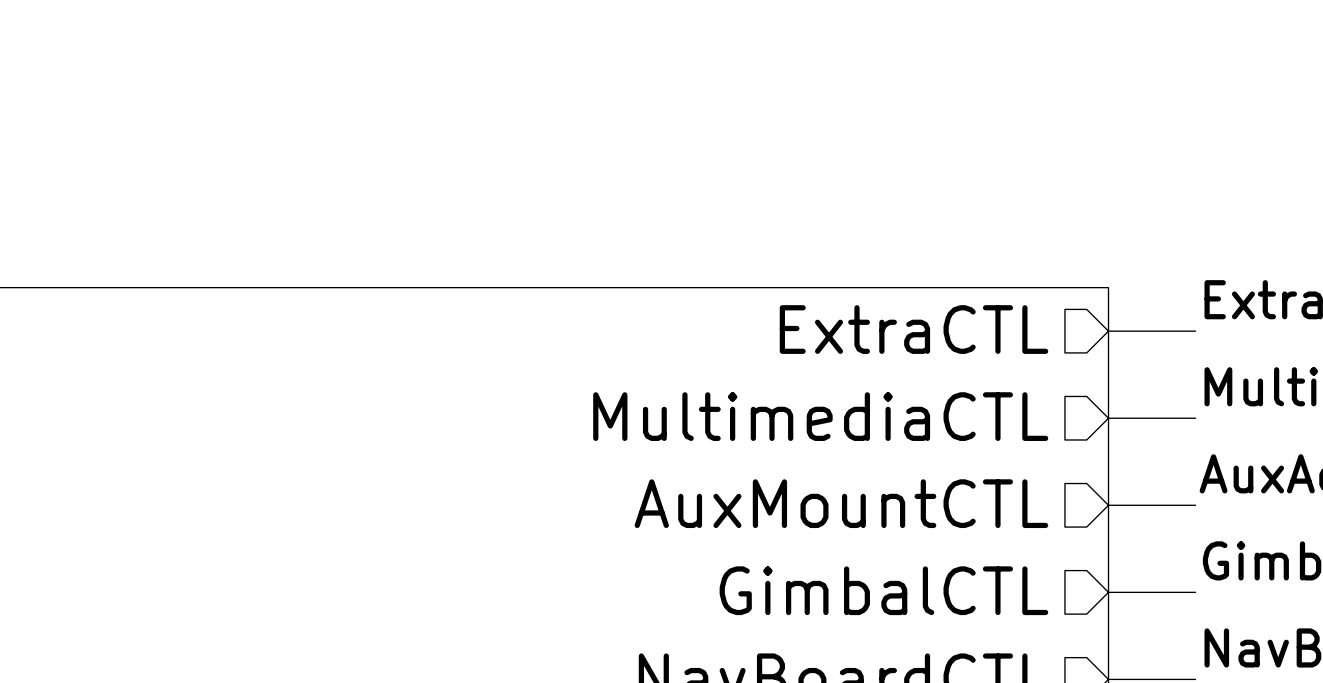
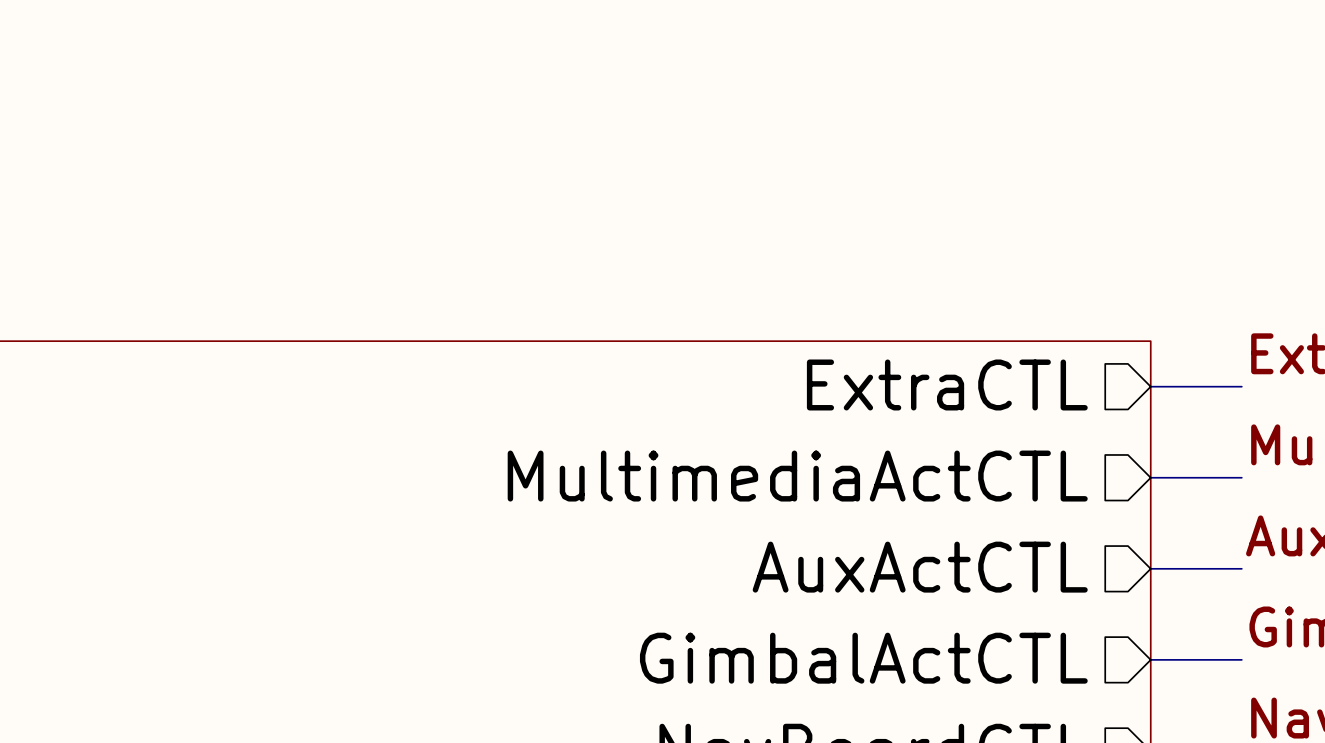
sheet pin: MultimediaCTL (820, 416) -> MultimediaActCTL (797, 476)
sheet pin: AuxMountCTL (841, 503) -> AuxActCTL (920, 567)
sheet pin: GimbalCTL (883, 590) -> GimbalActCTL (863, 658)

